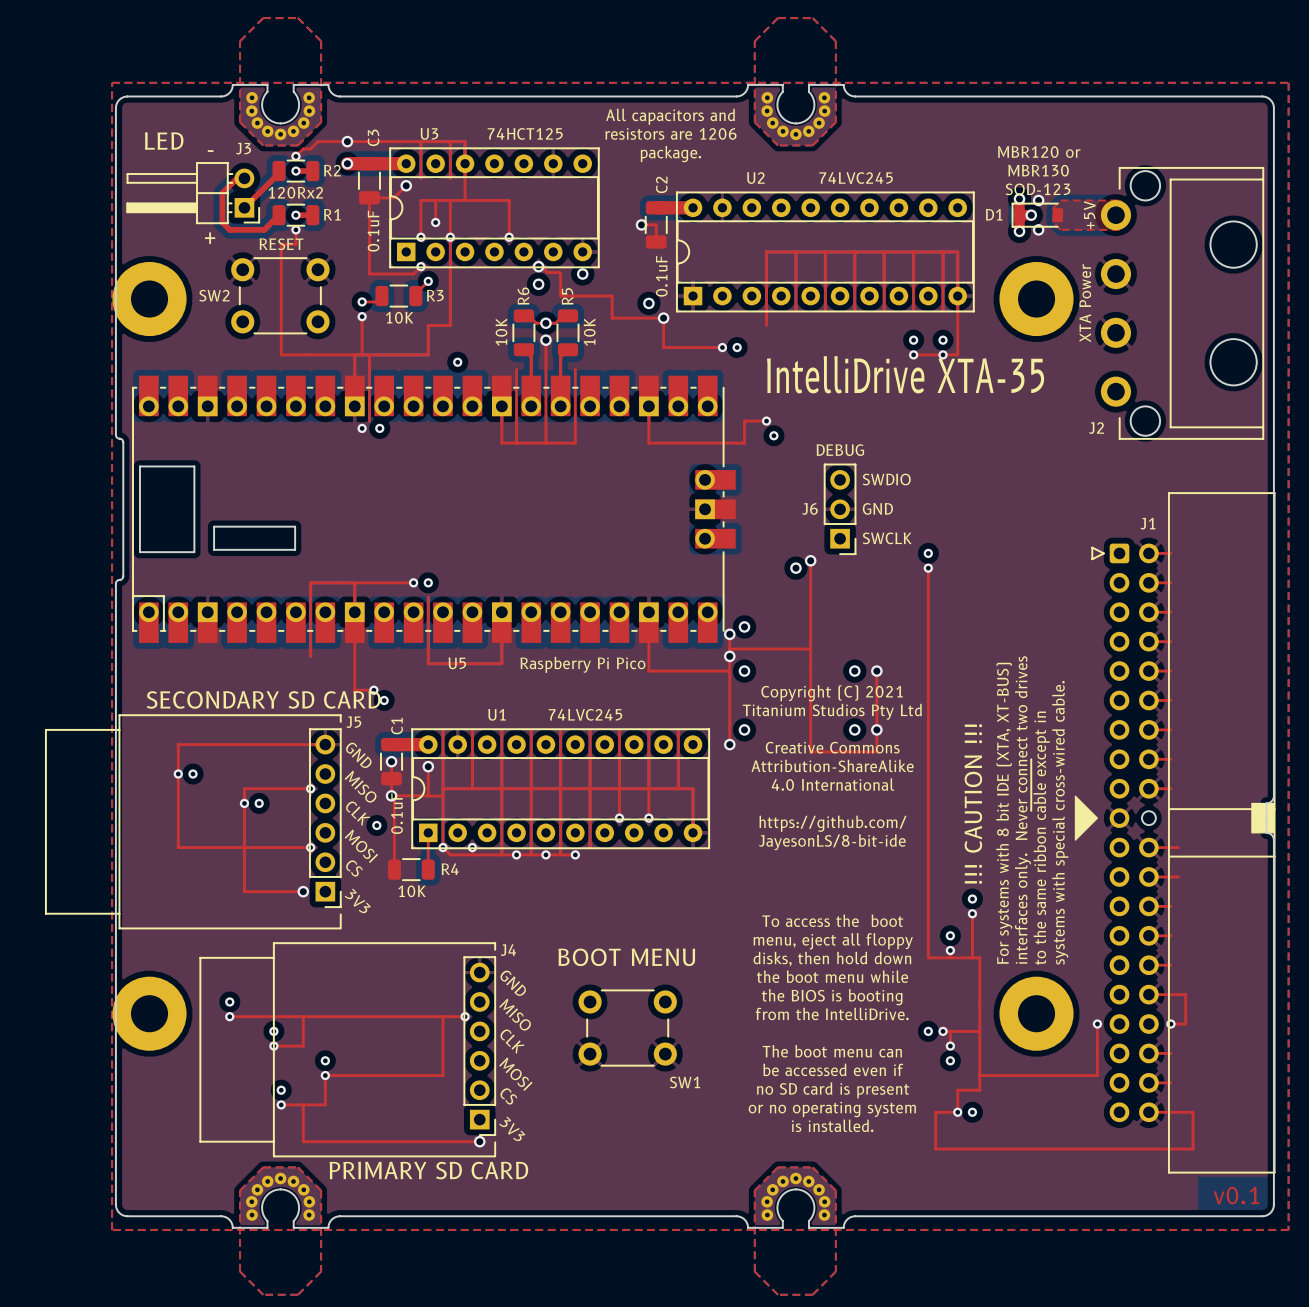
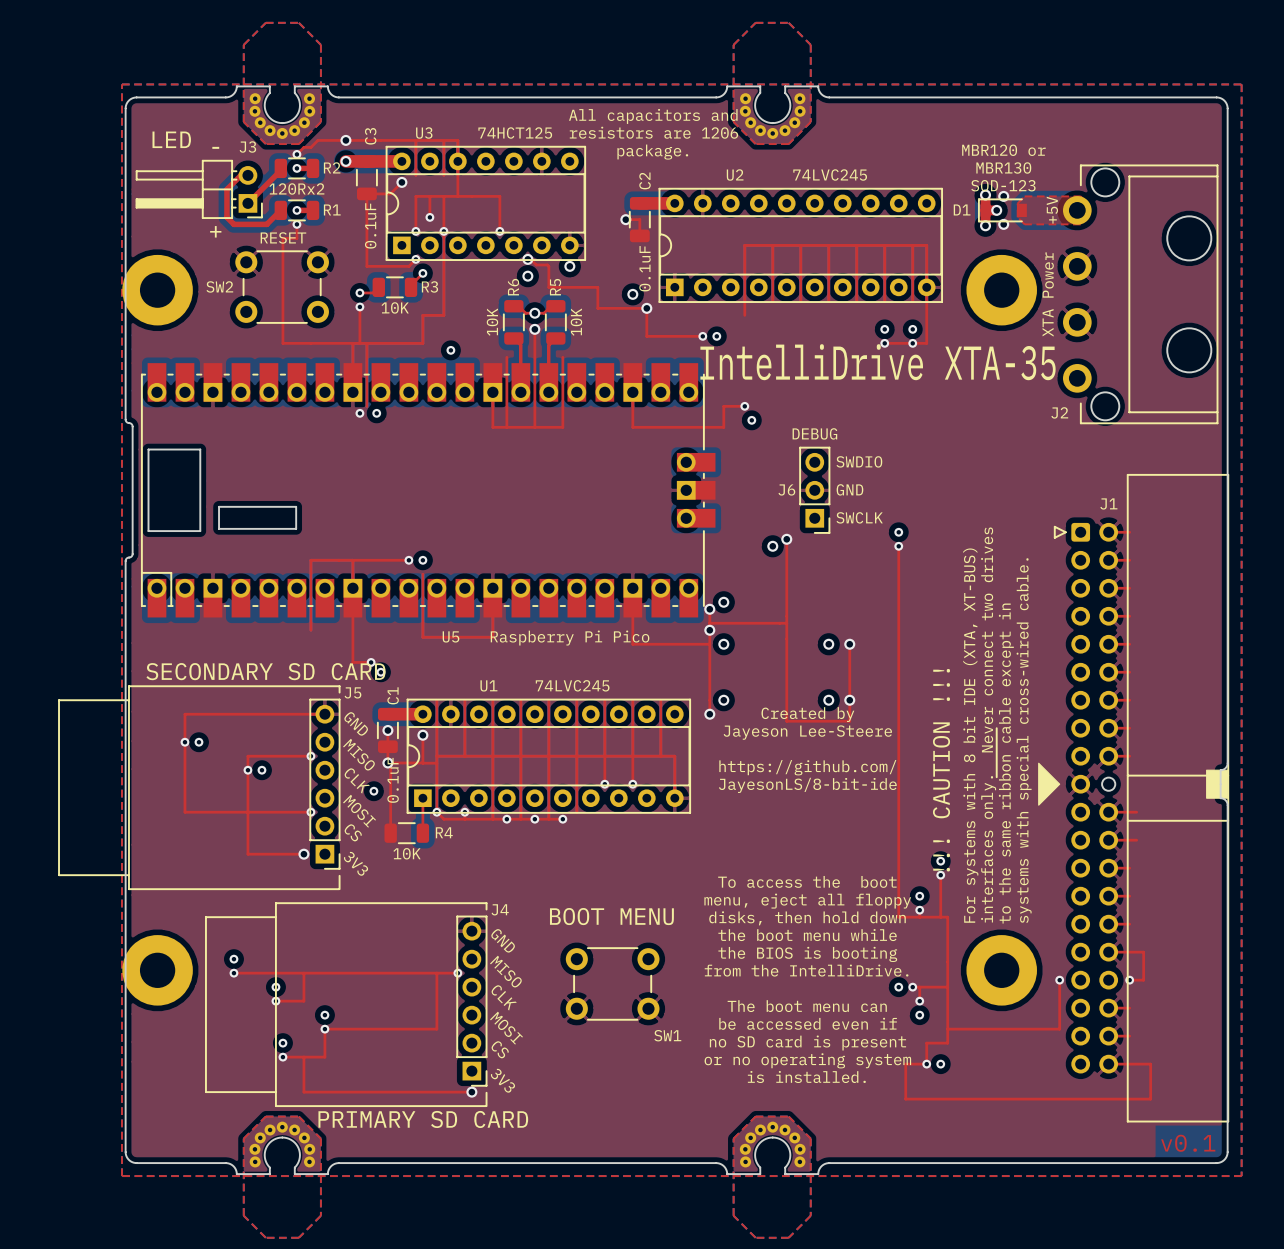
text: Copyright (C) 2021 (832, 693) -> none
text: Titanium Studios Pty Ltd (832, 711) -> none
text: Creative Commons (832, 747) -> Created by (807, 714)
text: Attribution-ShareAlike (832, 765) -> Jayeson Lee-Steere (807, 732)
text: 4.0 International (833, 784) -> none
text: none -> https://github.com/ (807, 767)
text: https://github.com/ (832, 823) -> JayesonLS/8-bit-ide (807, 785)
text: JayesonLS/8-bit-ide (832, 842) -> none

